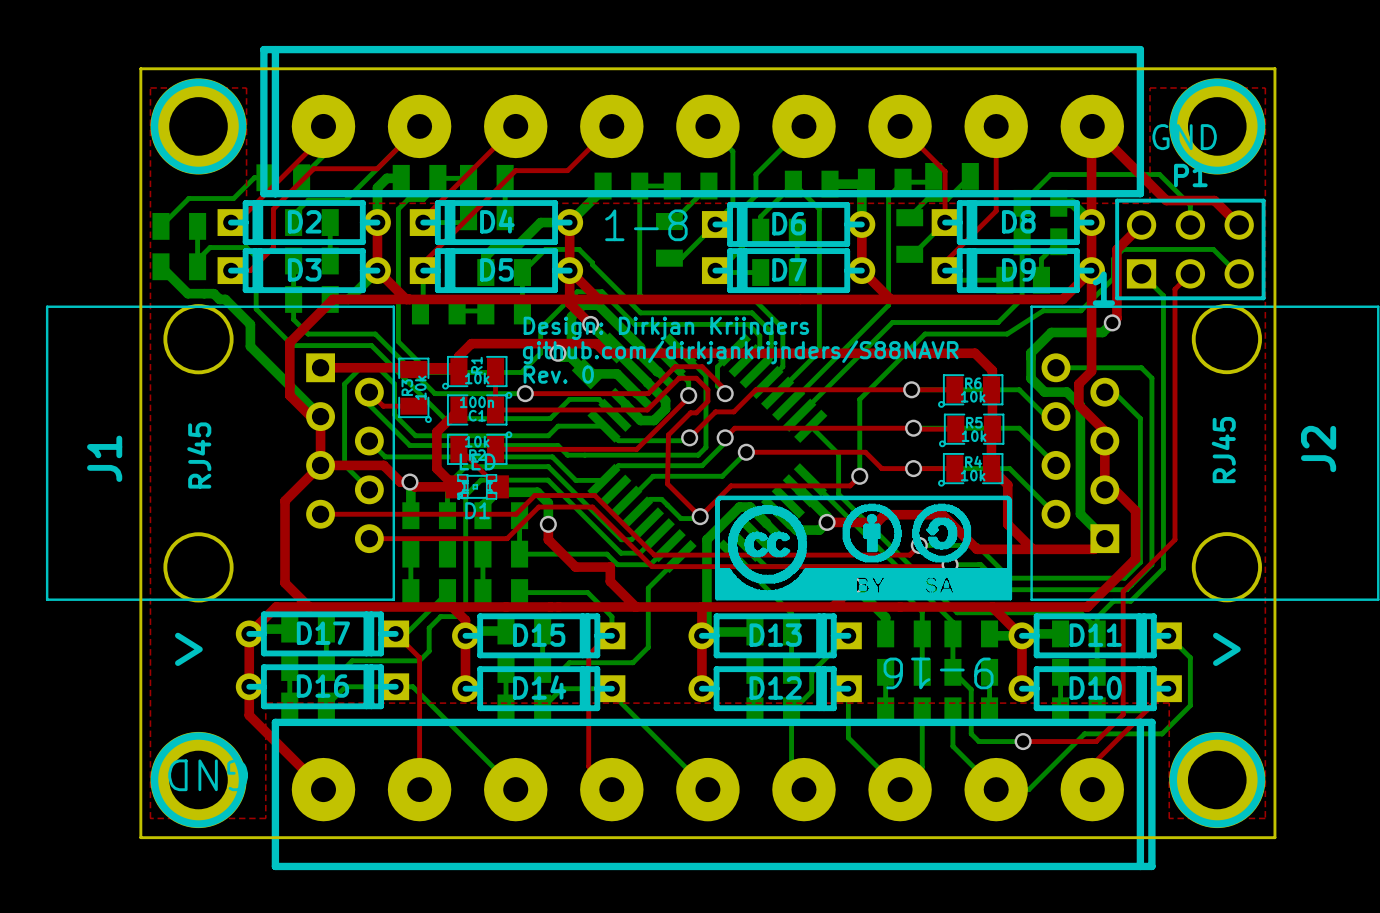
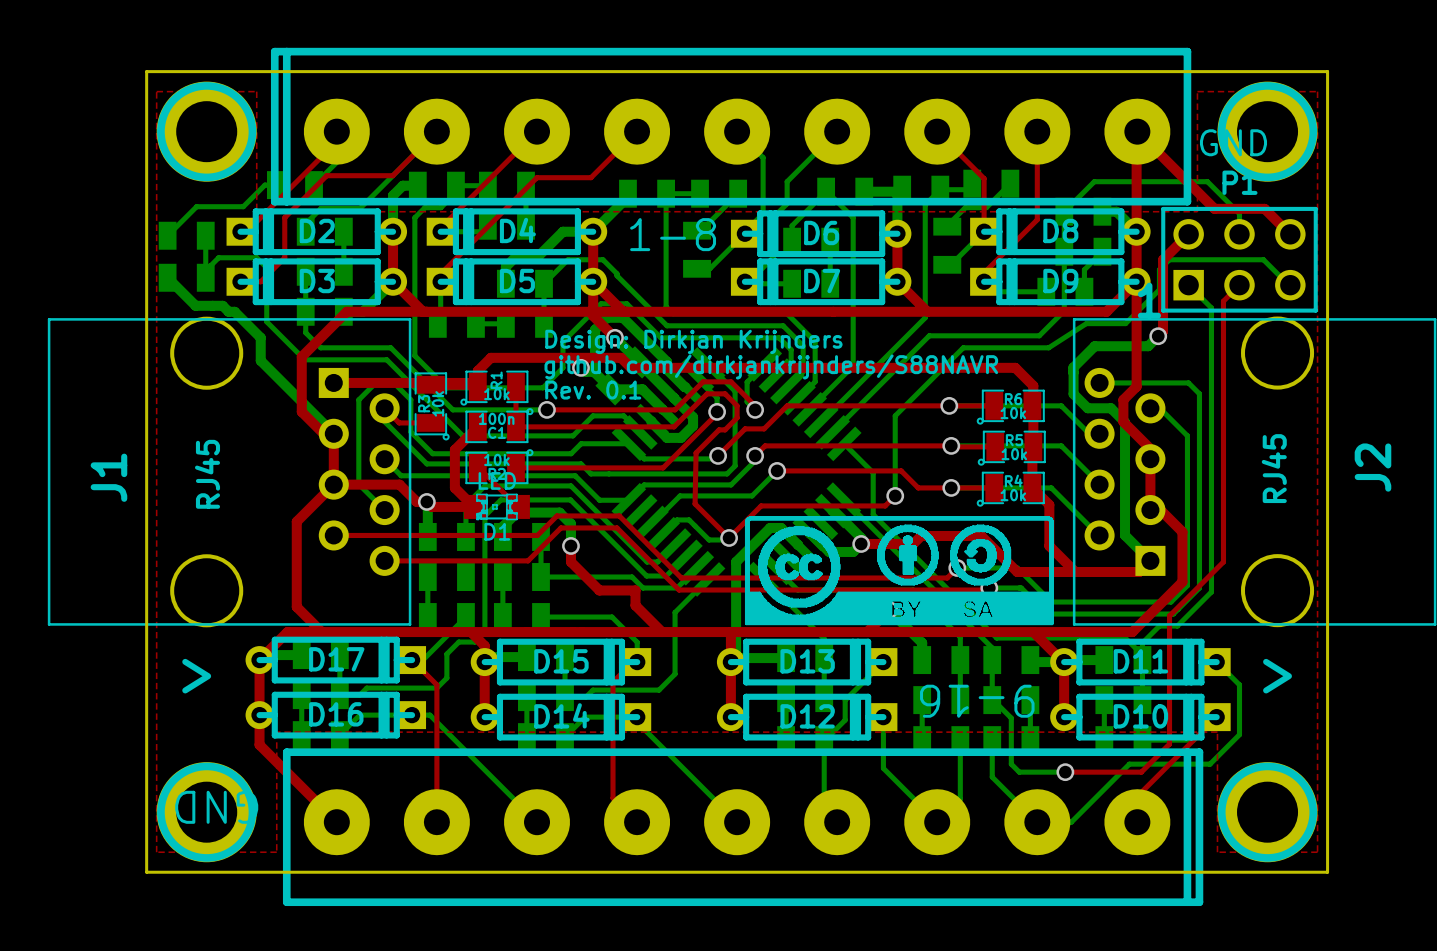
text: Rev. 0 (558, 374) -> Rev. 0.1 (593, 390)

